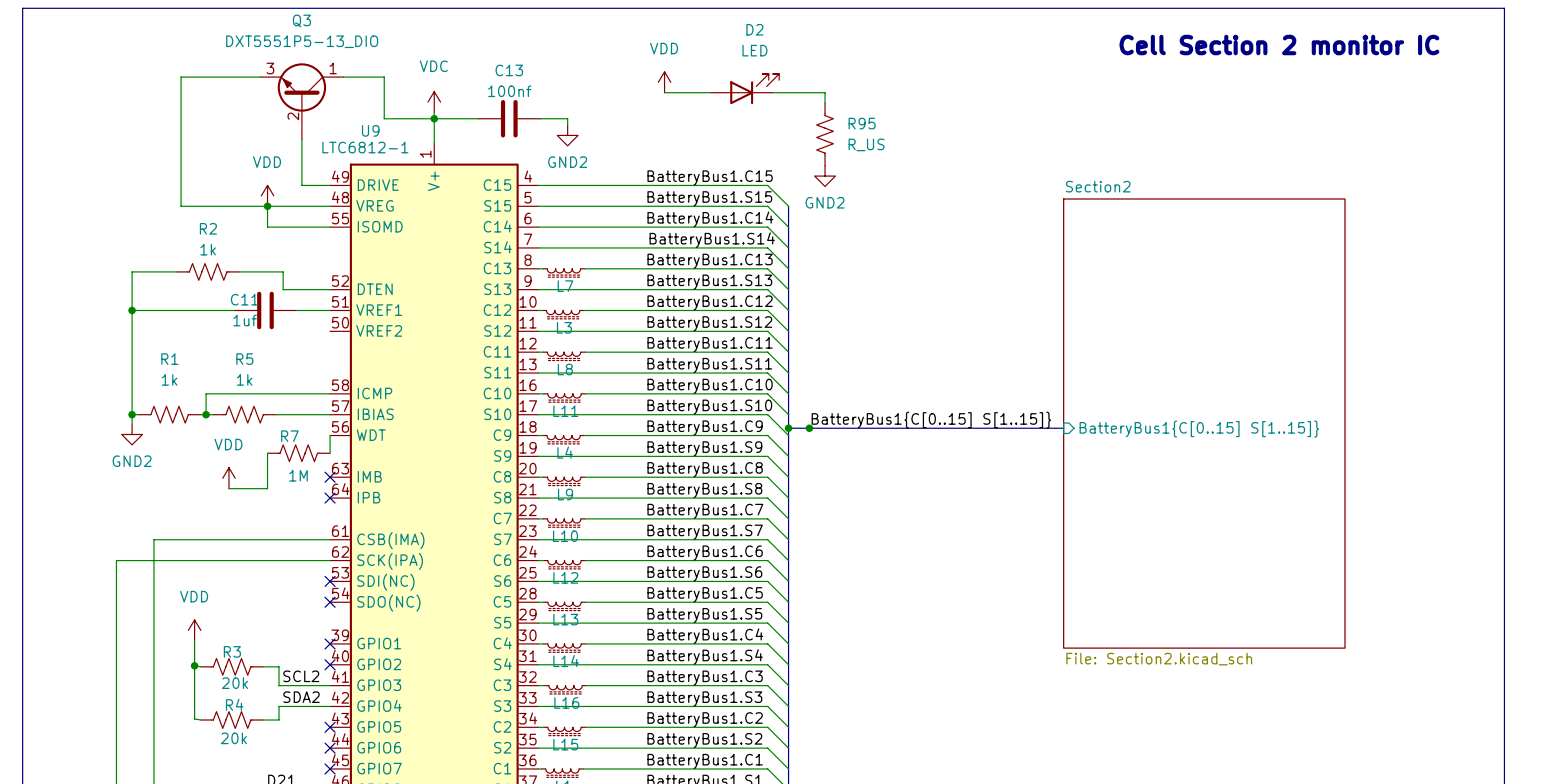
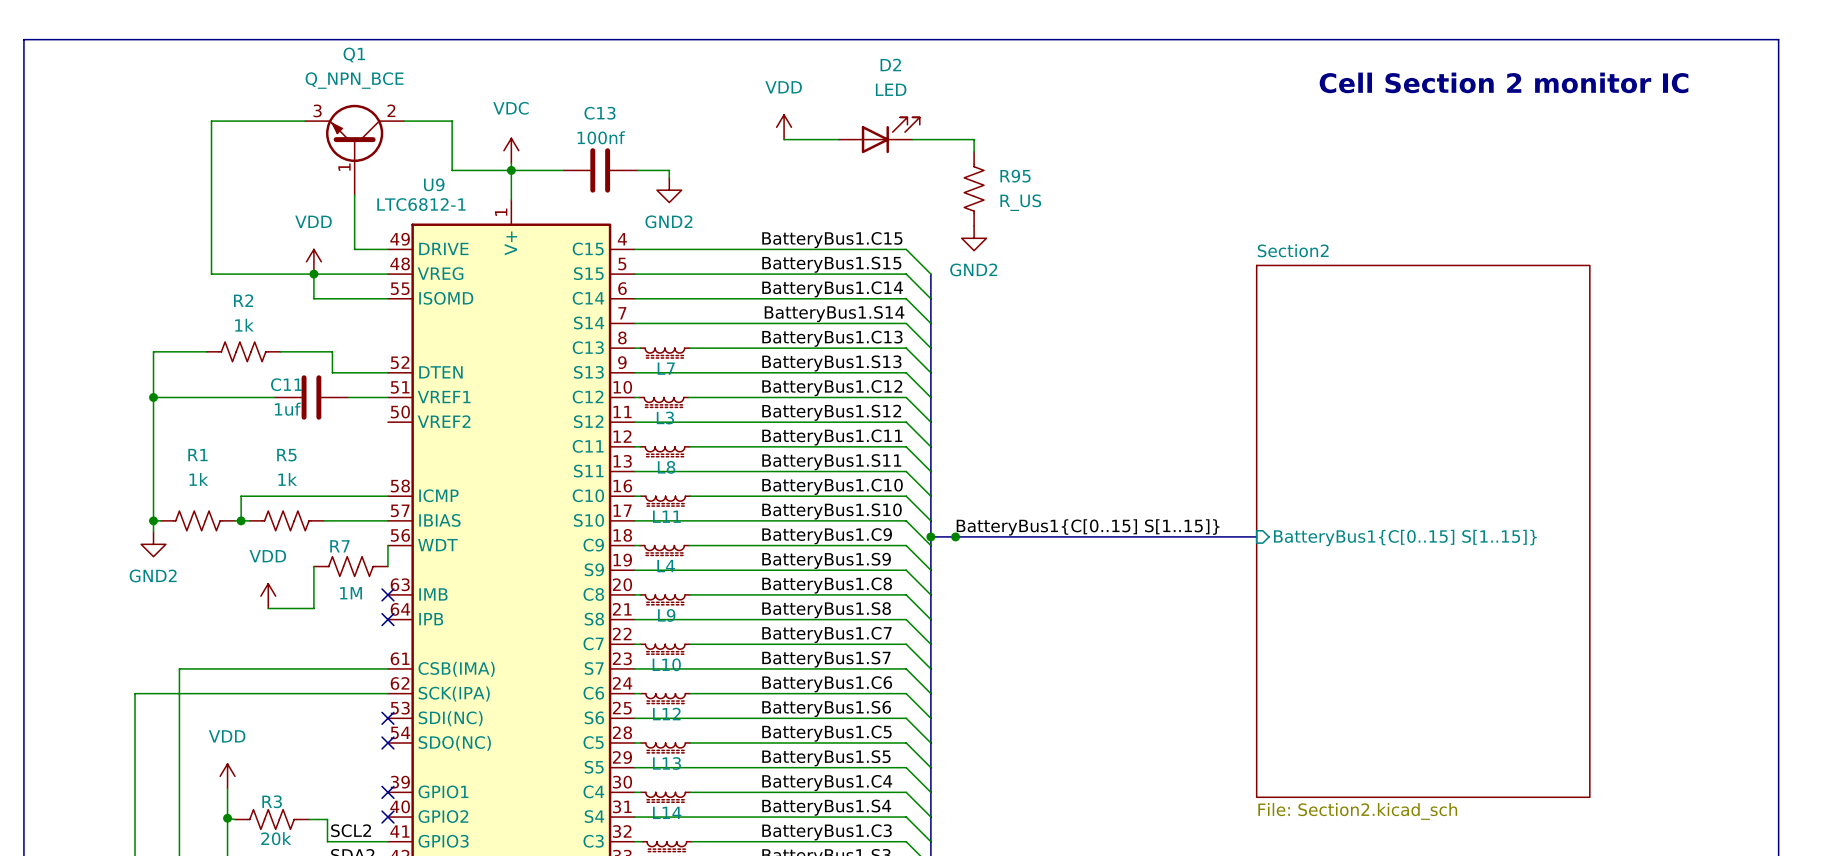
Q3 name: Q3 (301, 20) -> Q1 (354, 54)
Q3 value: DXT5551P5-13_DIO (302, 41) -> Q_NPN_BCE (354, 80)
Q3 pin number: 1 (333, 68) -> 2 (391, 110)
Q3 pin number: 2 (293, 116) -> 1 (344, 167)

